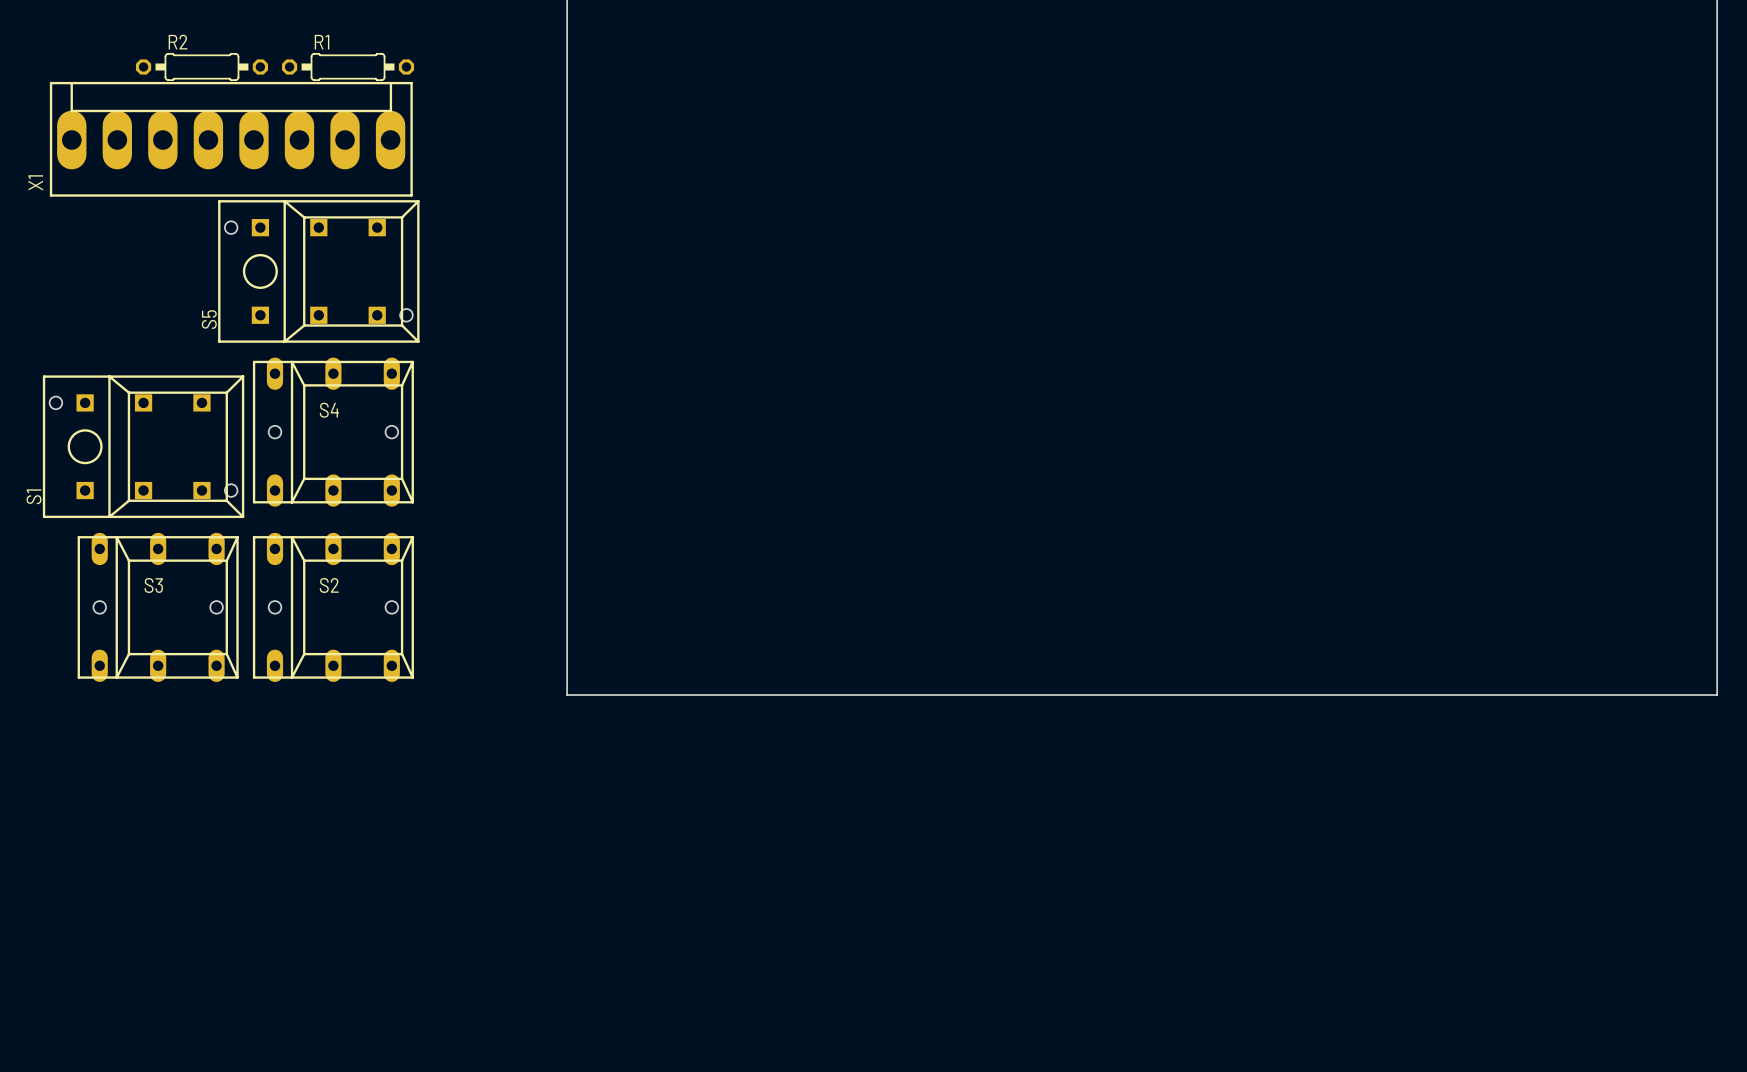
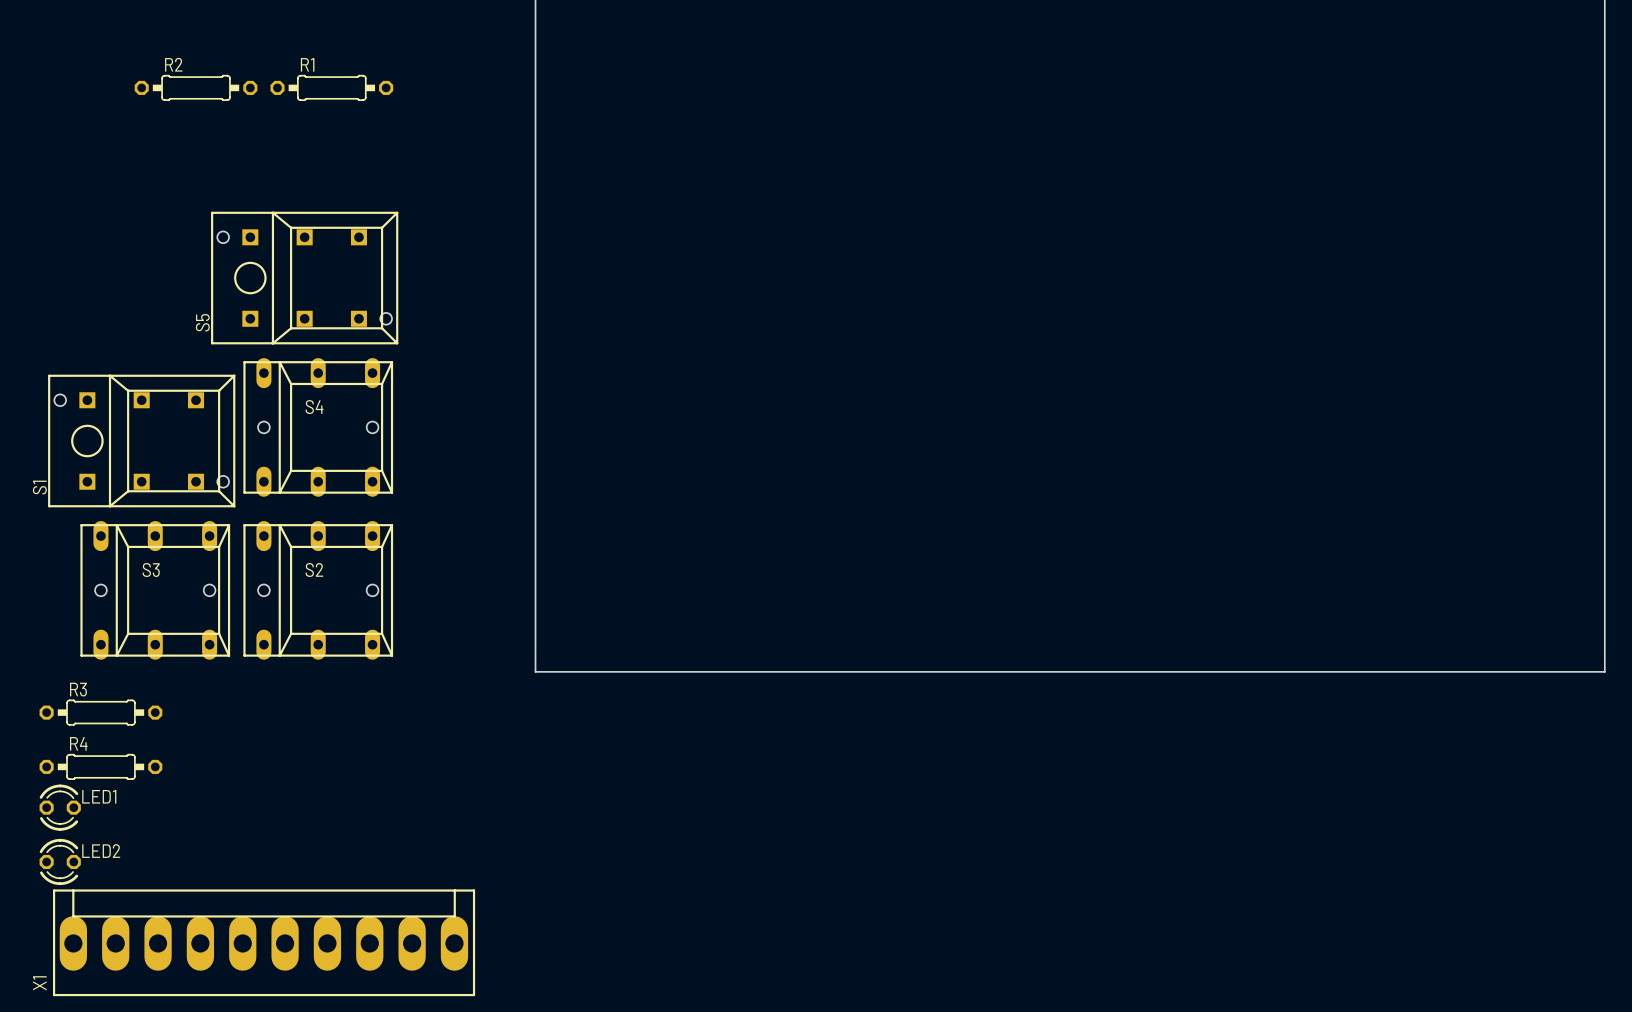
X1 footprint: [49, 81, 413, 197] -> [52, 889, 476, 997]
X1 name position: X1 (35, 182) -> X1 (39, 983)
R3: none -> (100, 712)
R4: none -> (100, 766)
LED1: none -> (60, 807)
LED2: none -> (60, 861)

